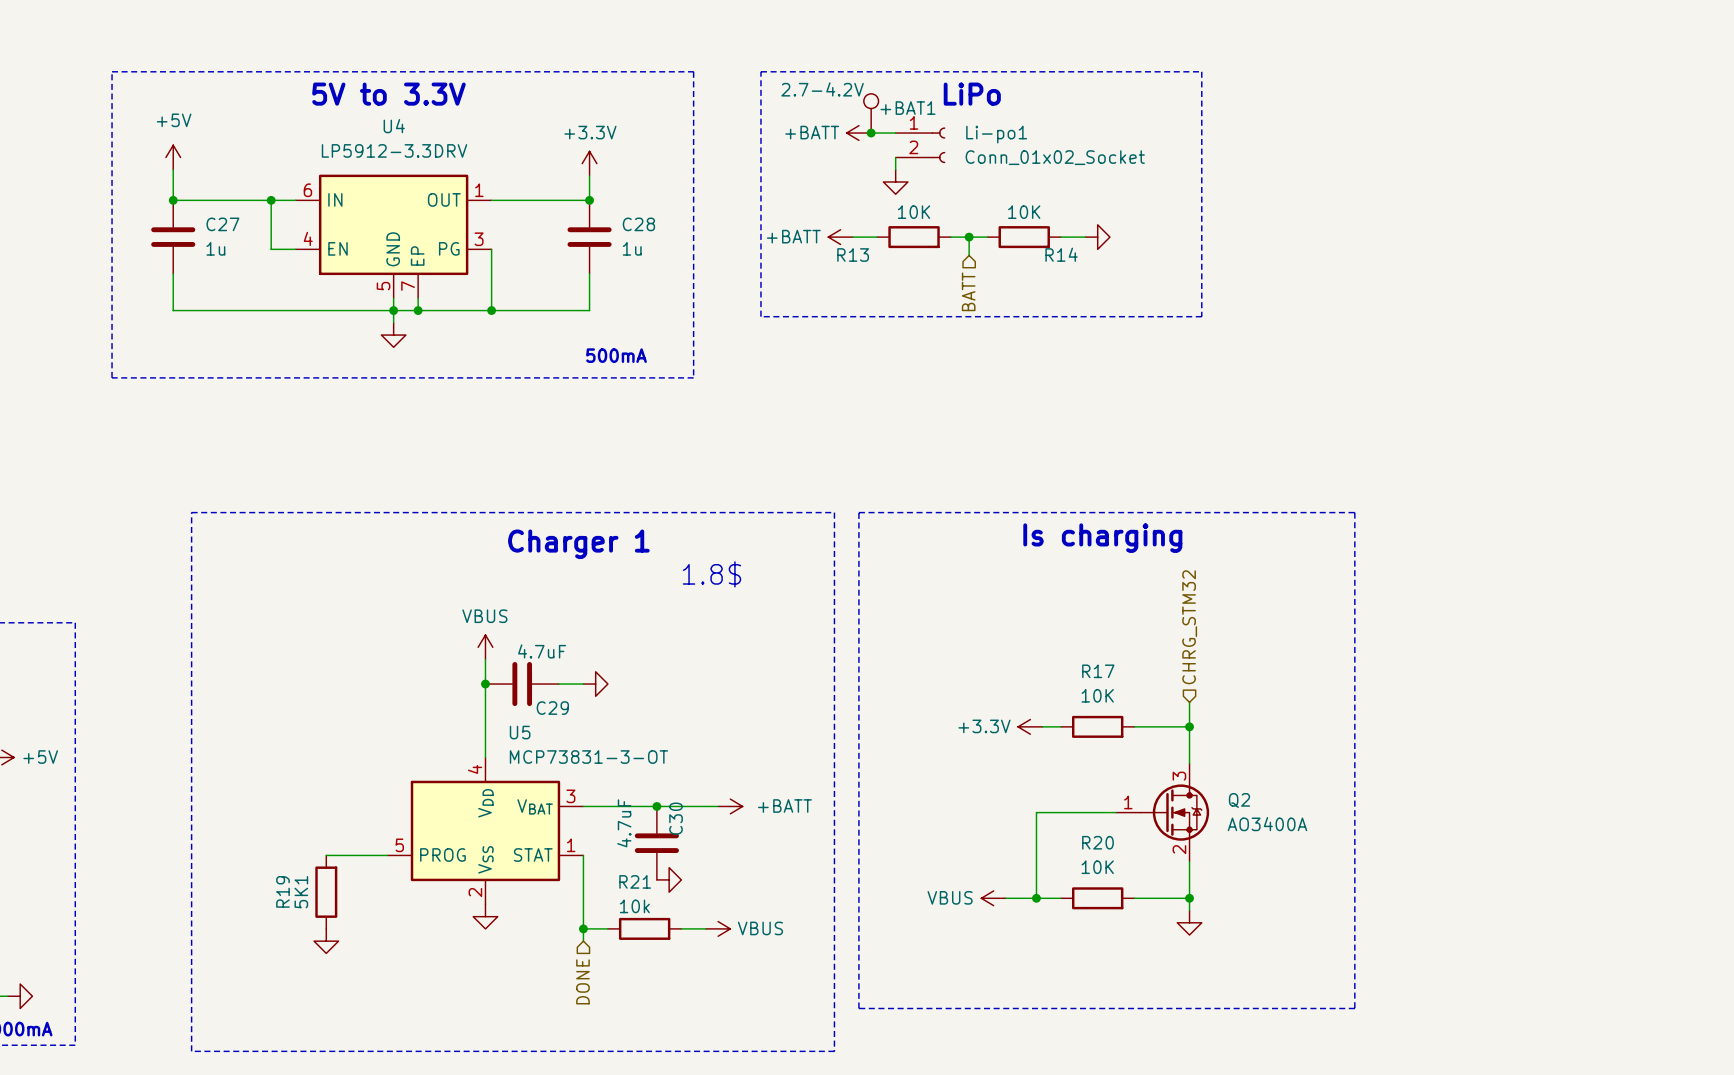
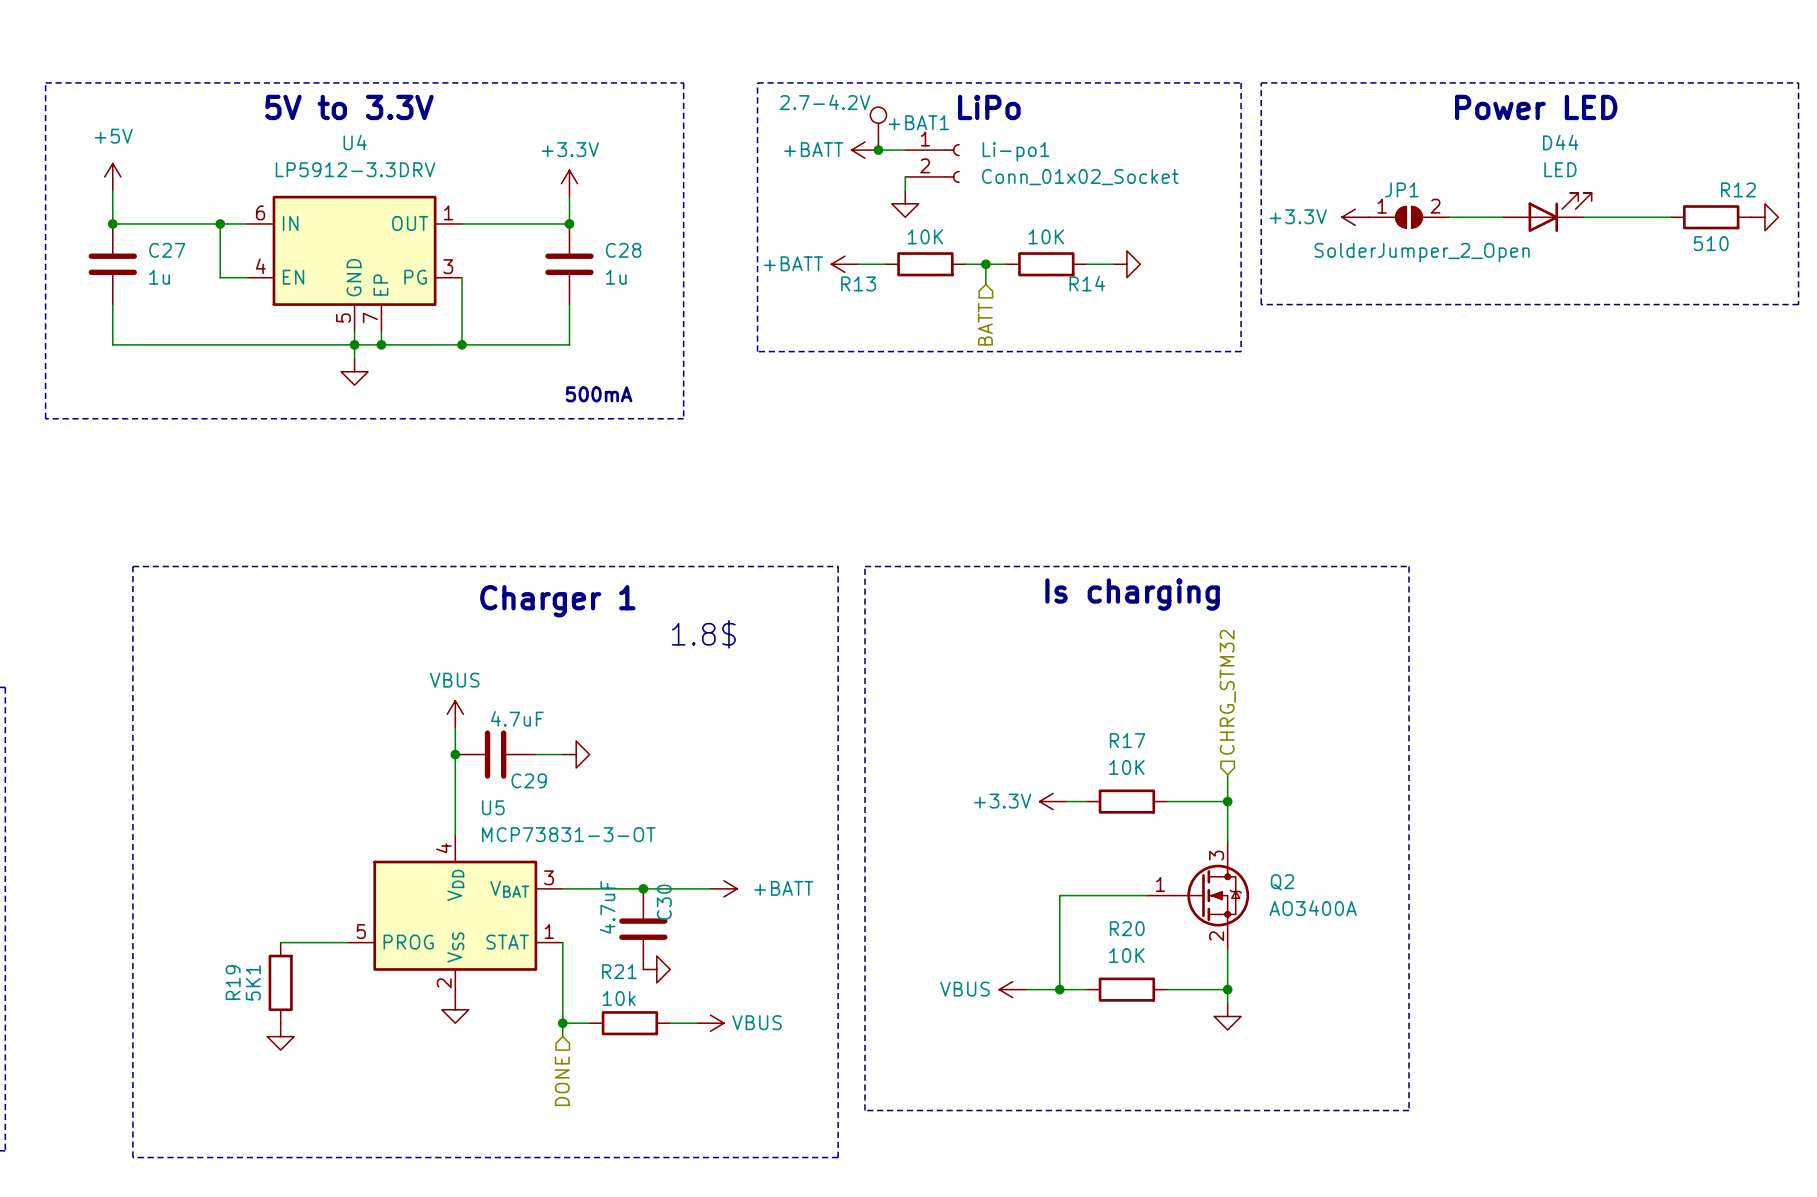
line: none -> (1261, 82) (1798, 82) (1798, 304) (1261, 304) (1261, 82)
text: none -> Power LED (1536, 107)
D44: none -> LED (1547, 212)
power symbol: none -> +3.3V (1355, 217)
JP1: none -> SolderJumper_2_Open (1409, 217)
wire: none -> (1449, 217) (1503, 217)
wire: none -> (1583, 217) (1670, 217)
R12: none -> 510 (1711, 217)
power symbol: none -> (1764, 217)

